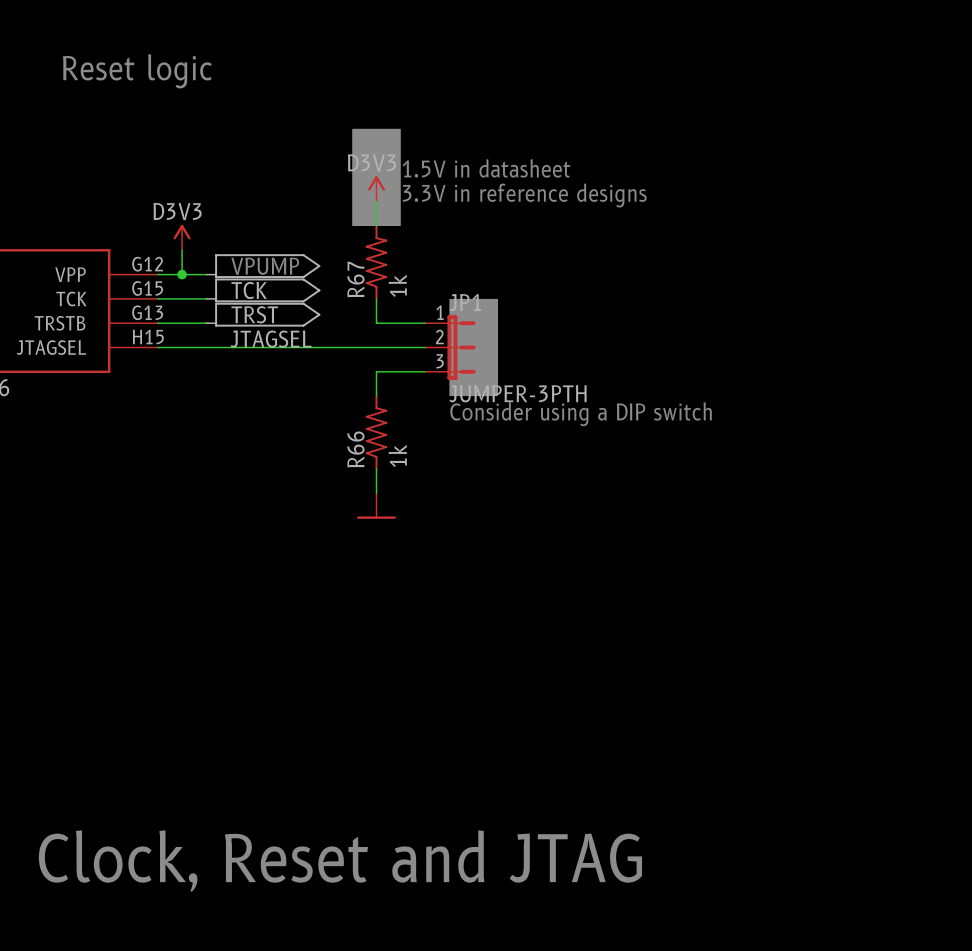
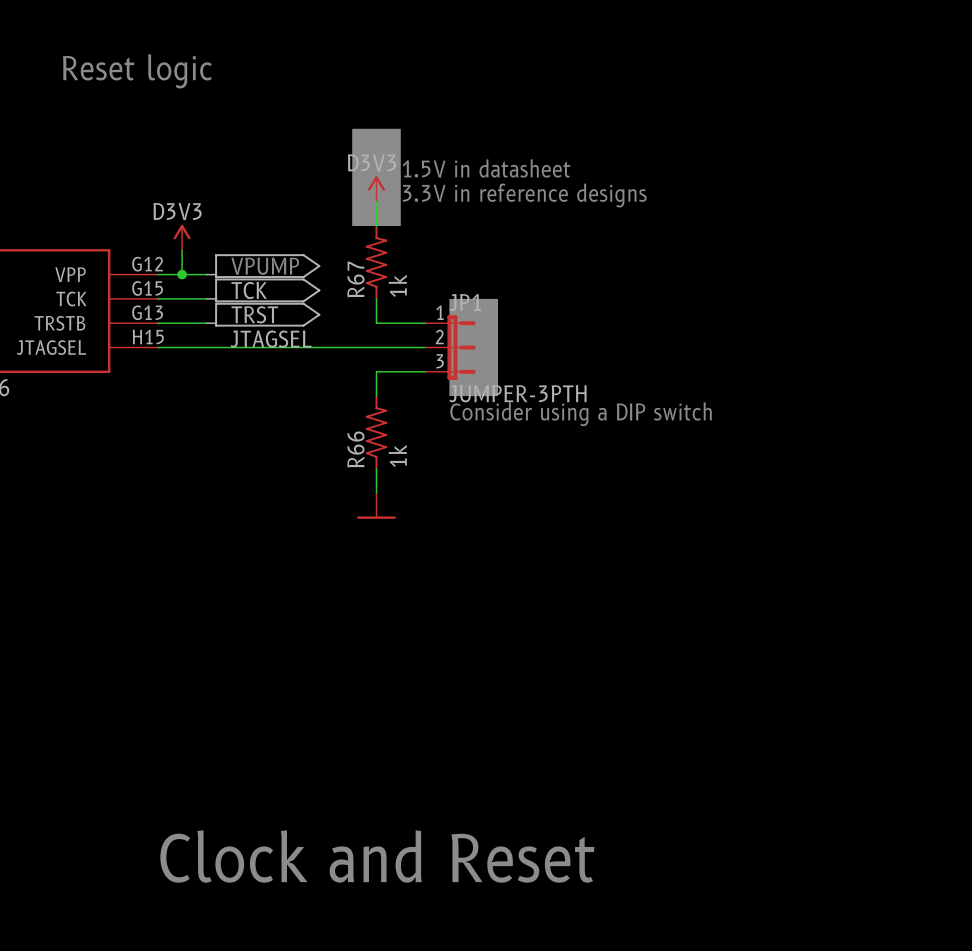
text: Clock, Reset and JTAG (340, 861) -> Clock and Reset (377, 856)

